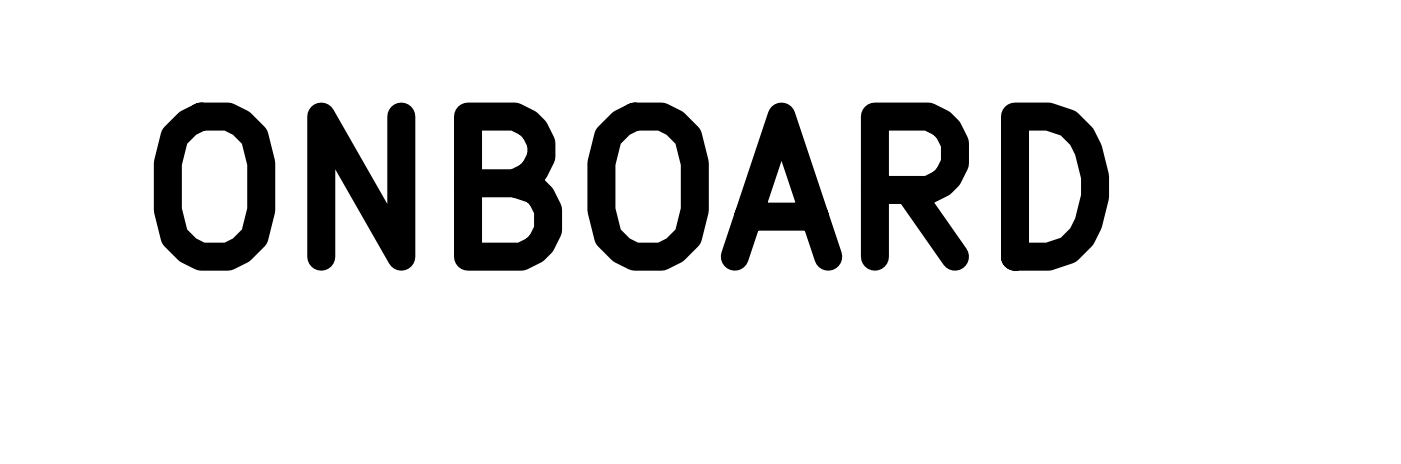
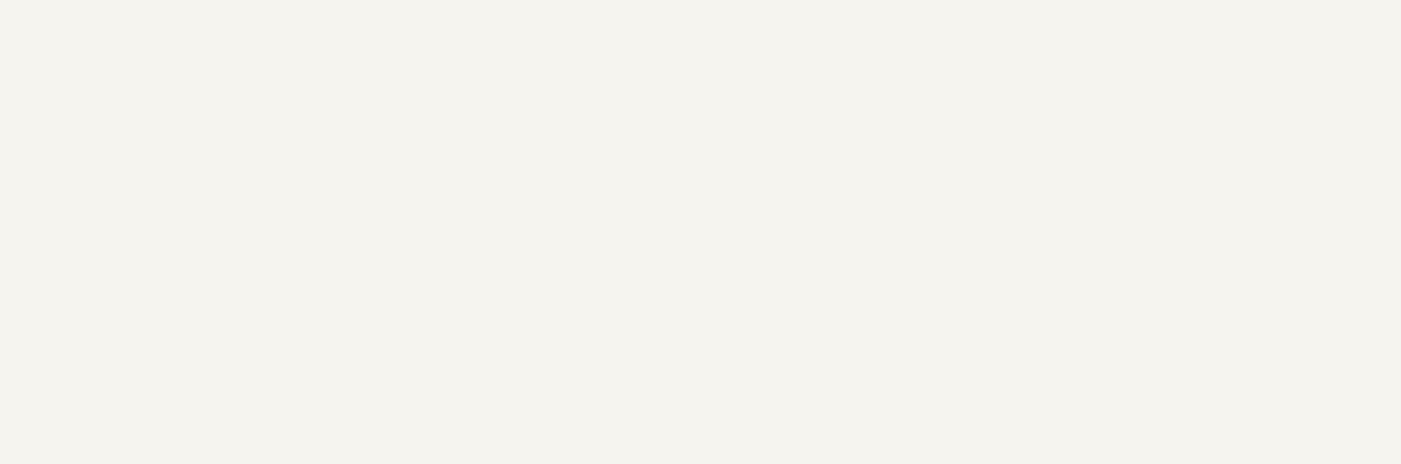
text: ONBOARD (631, 186) -> none

